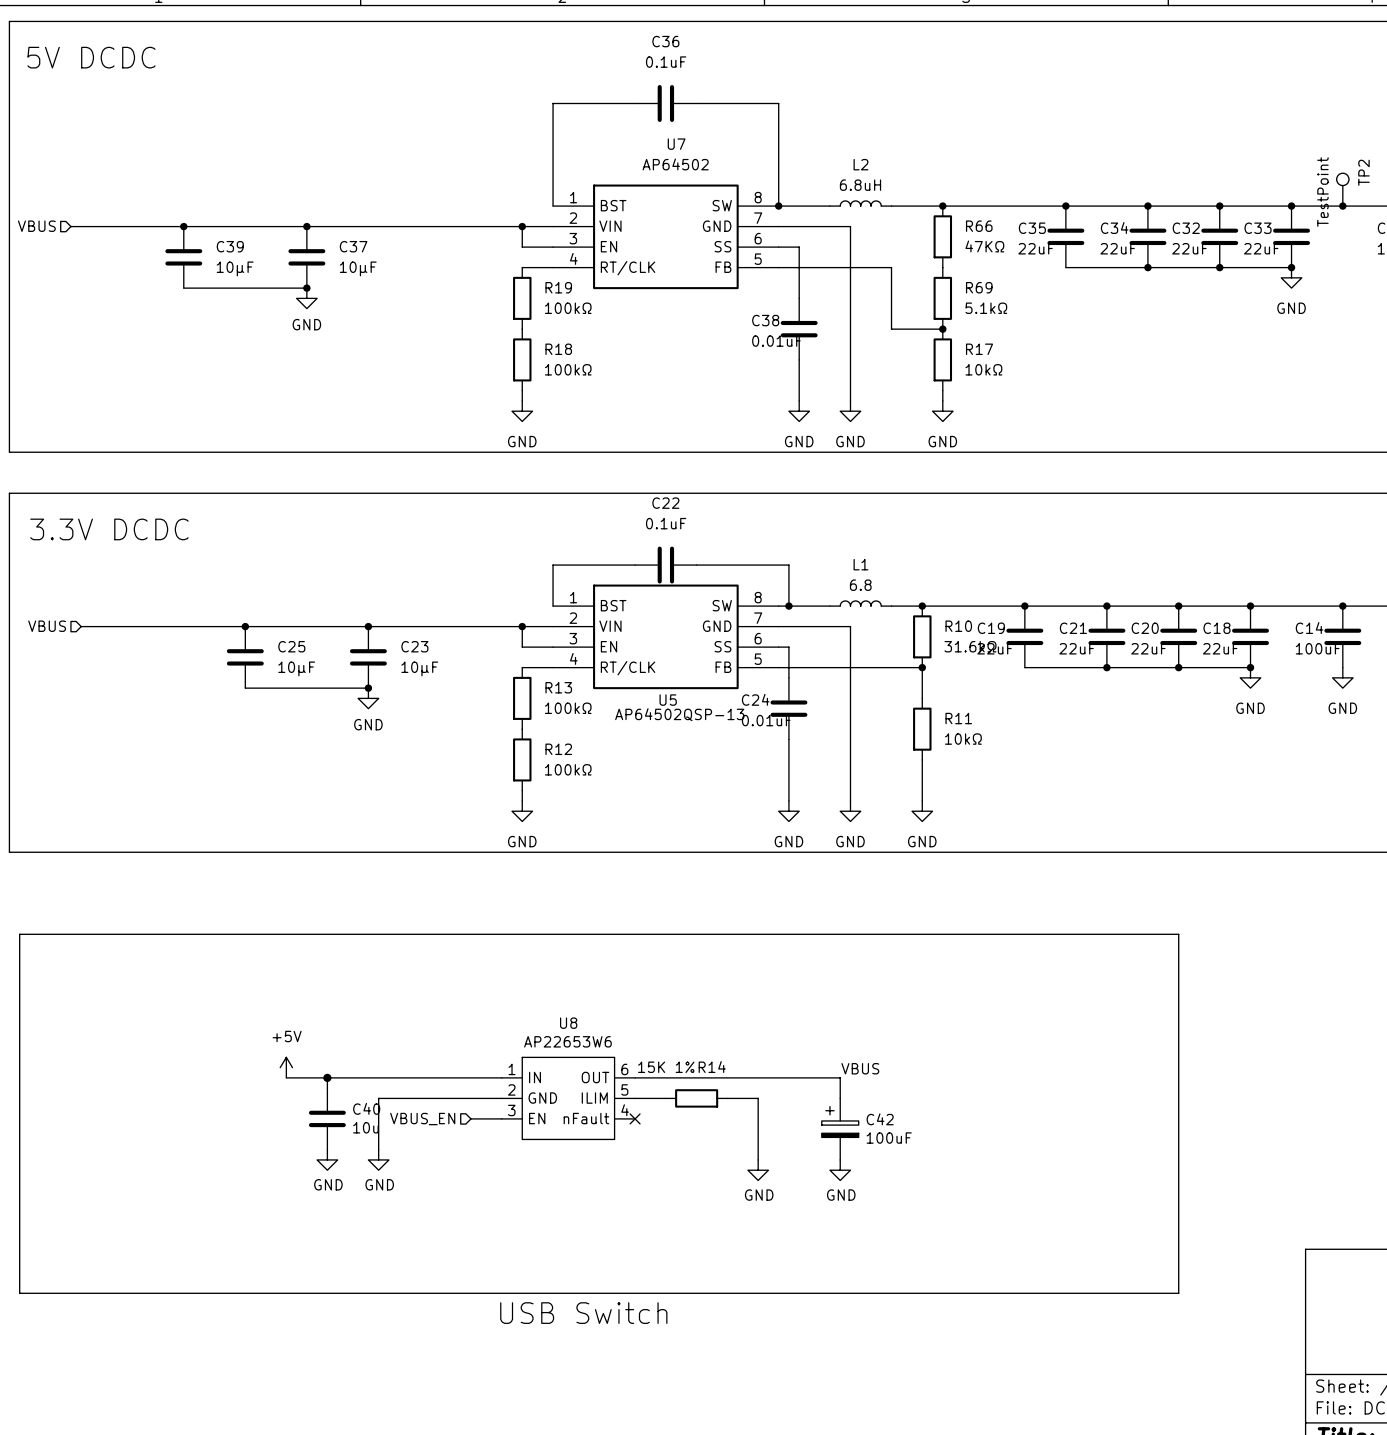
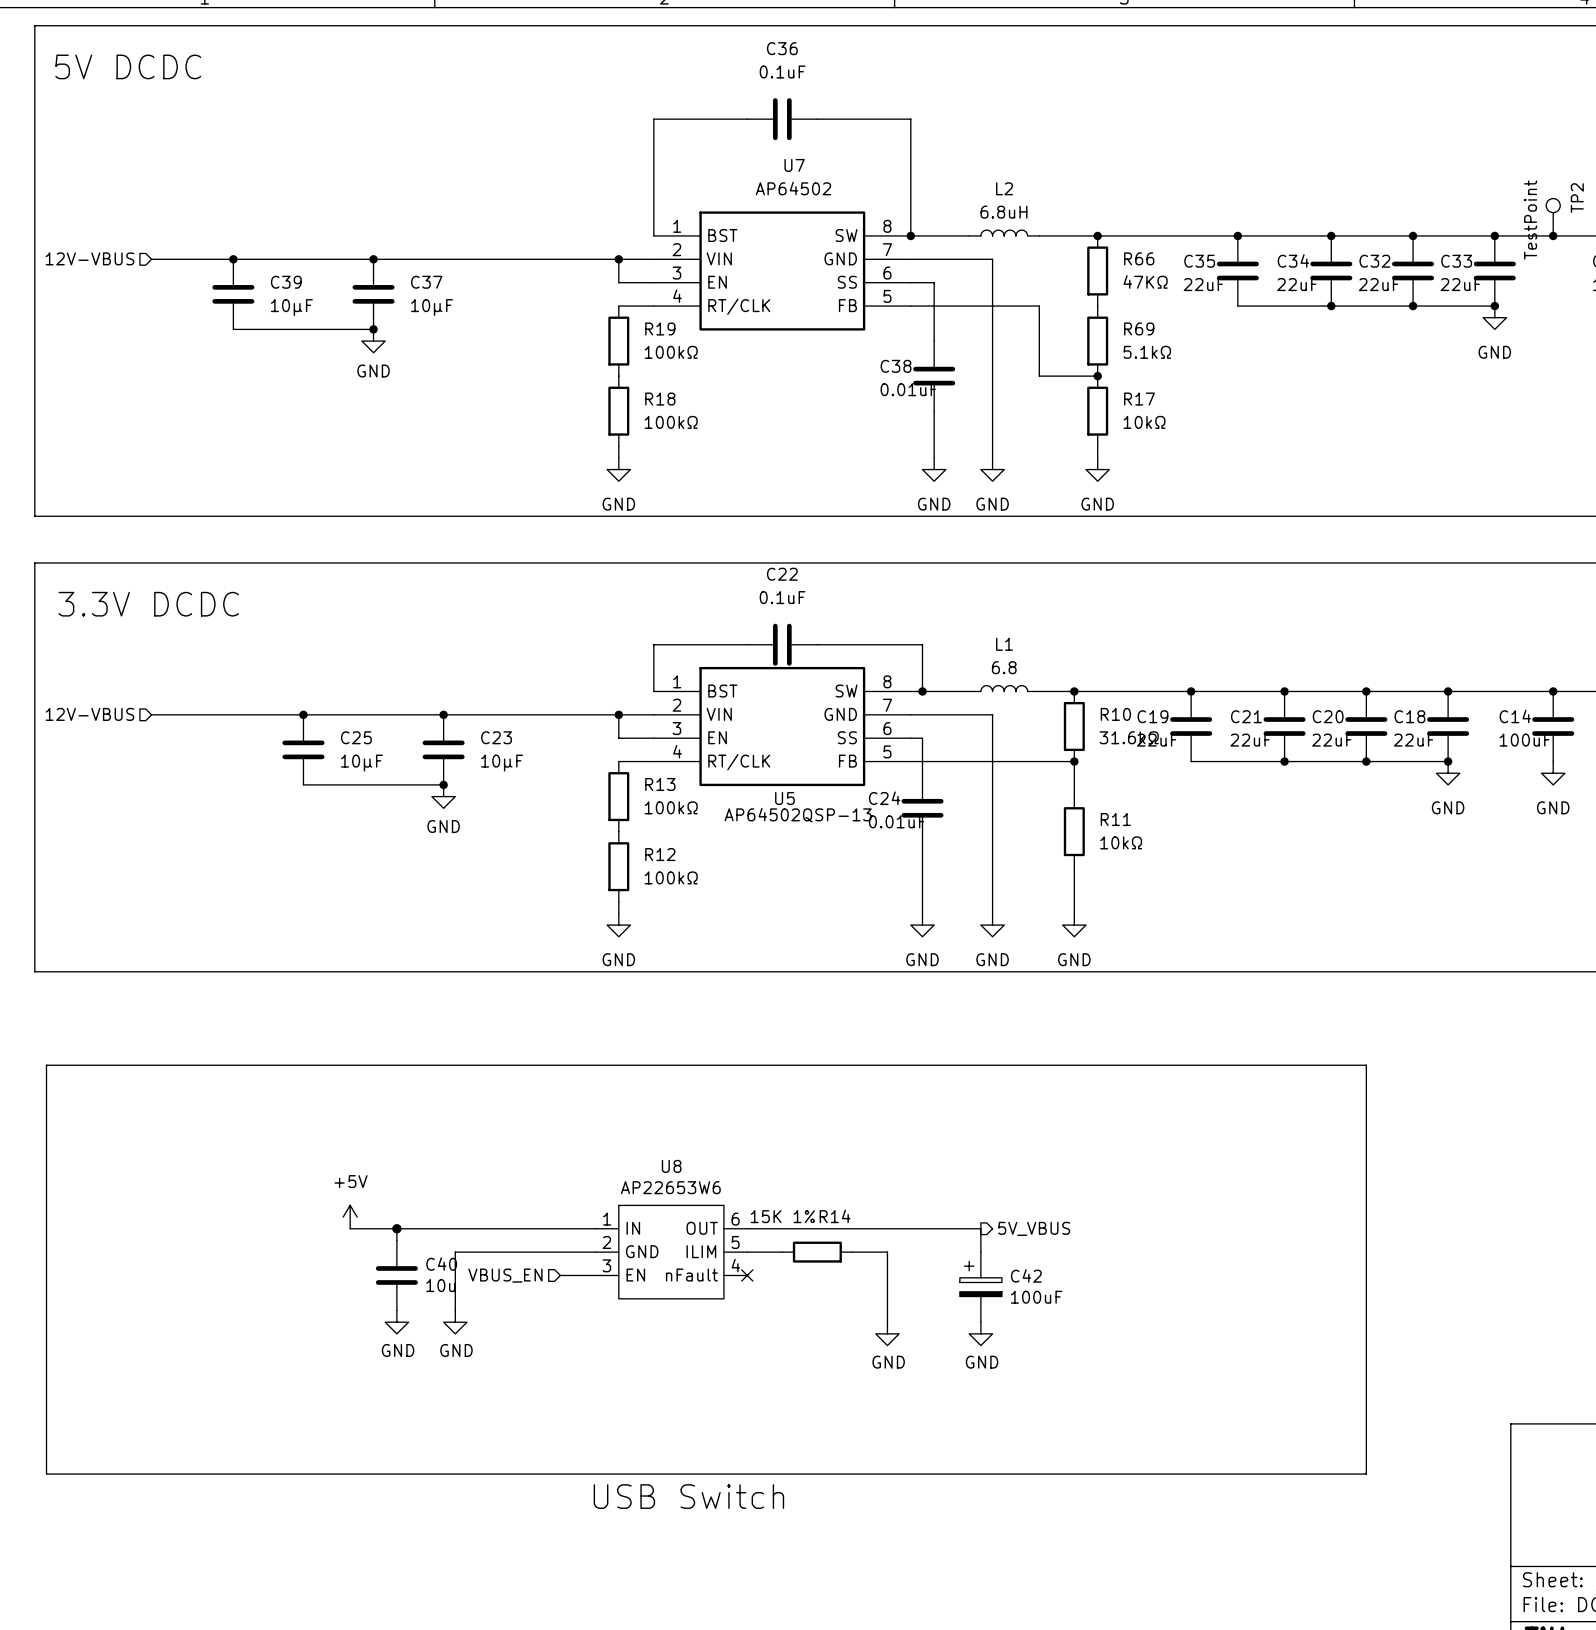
hierarchical label: VBUS (36, 226) -> 12V-VBUS (89, 258)
wire: (70, 226) (111, 226) -> none
hierarchical label: VBUS (47, 626) -> 12V-VBUS (89, 714)
wire: (81, 626) (111, 626) -> none
label: VBUS (860, 1068) -> none
hierarchical label: none -> 5V_VBUS (1034, 1228)

